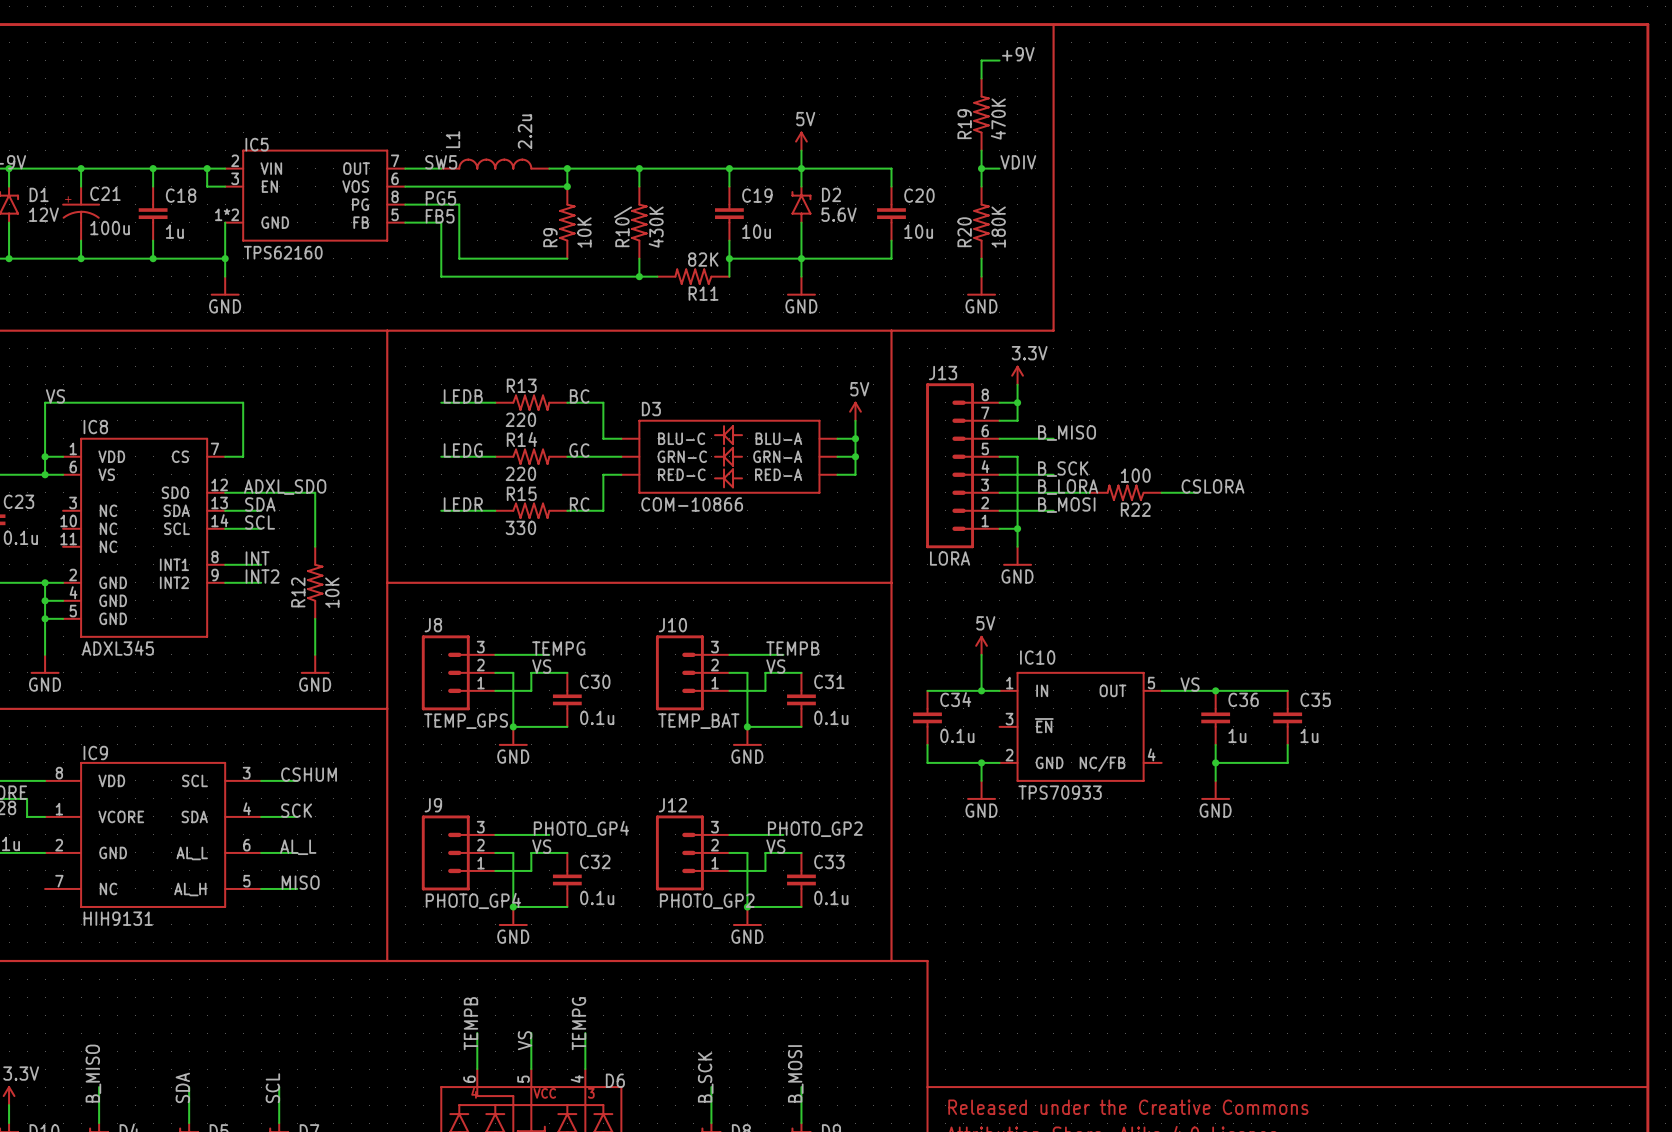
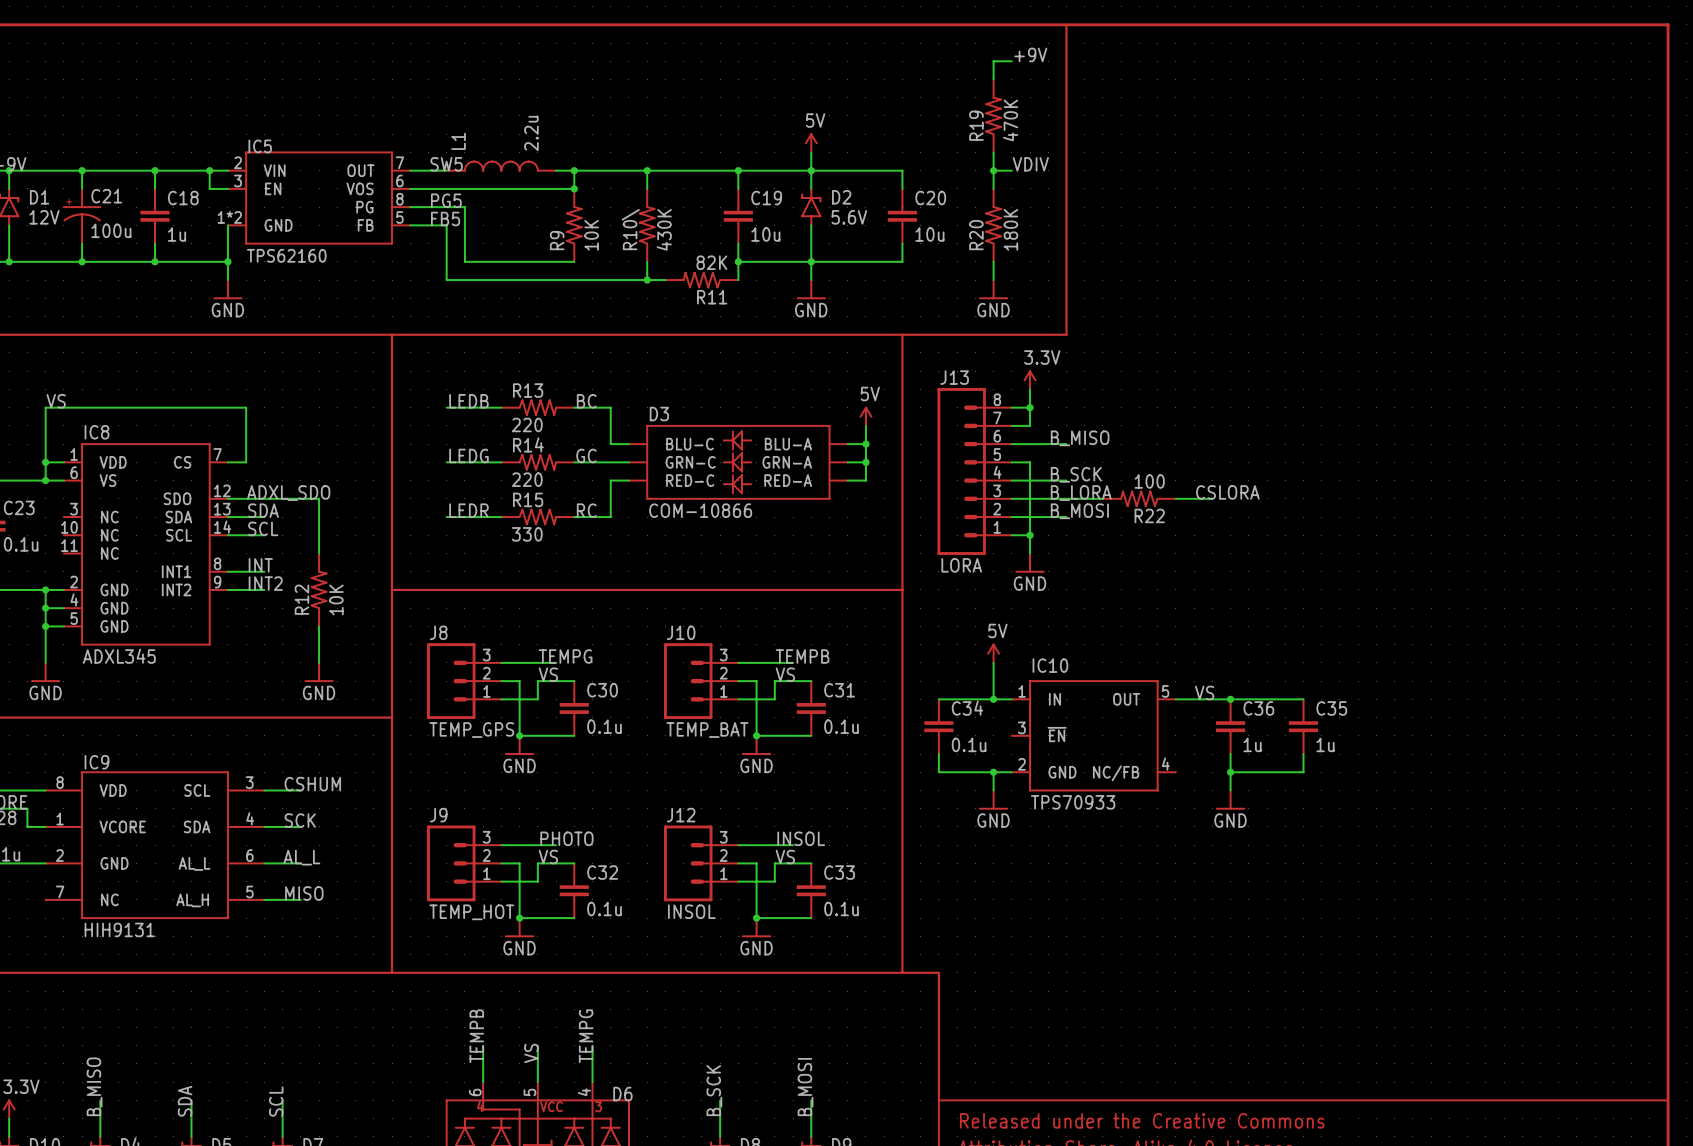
label: PHOTO_GP4 (581, 828) -> PHOTO (566, 838)
label: PHOTO_GP2 (815, 829) -> INSOL (801, 838)
J9 value: PHOTO_GP4 (473, 900) -> TEMP_HOT (471, 912)
J12 value: PHOTO_GP2 (707, 901) -> INSOL (691, 911)

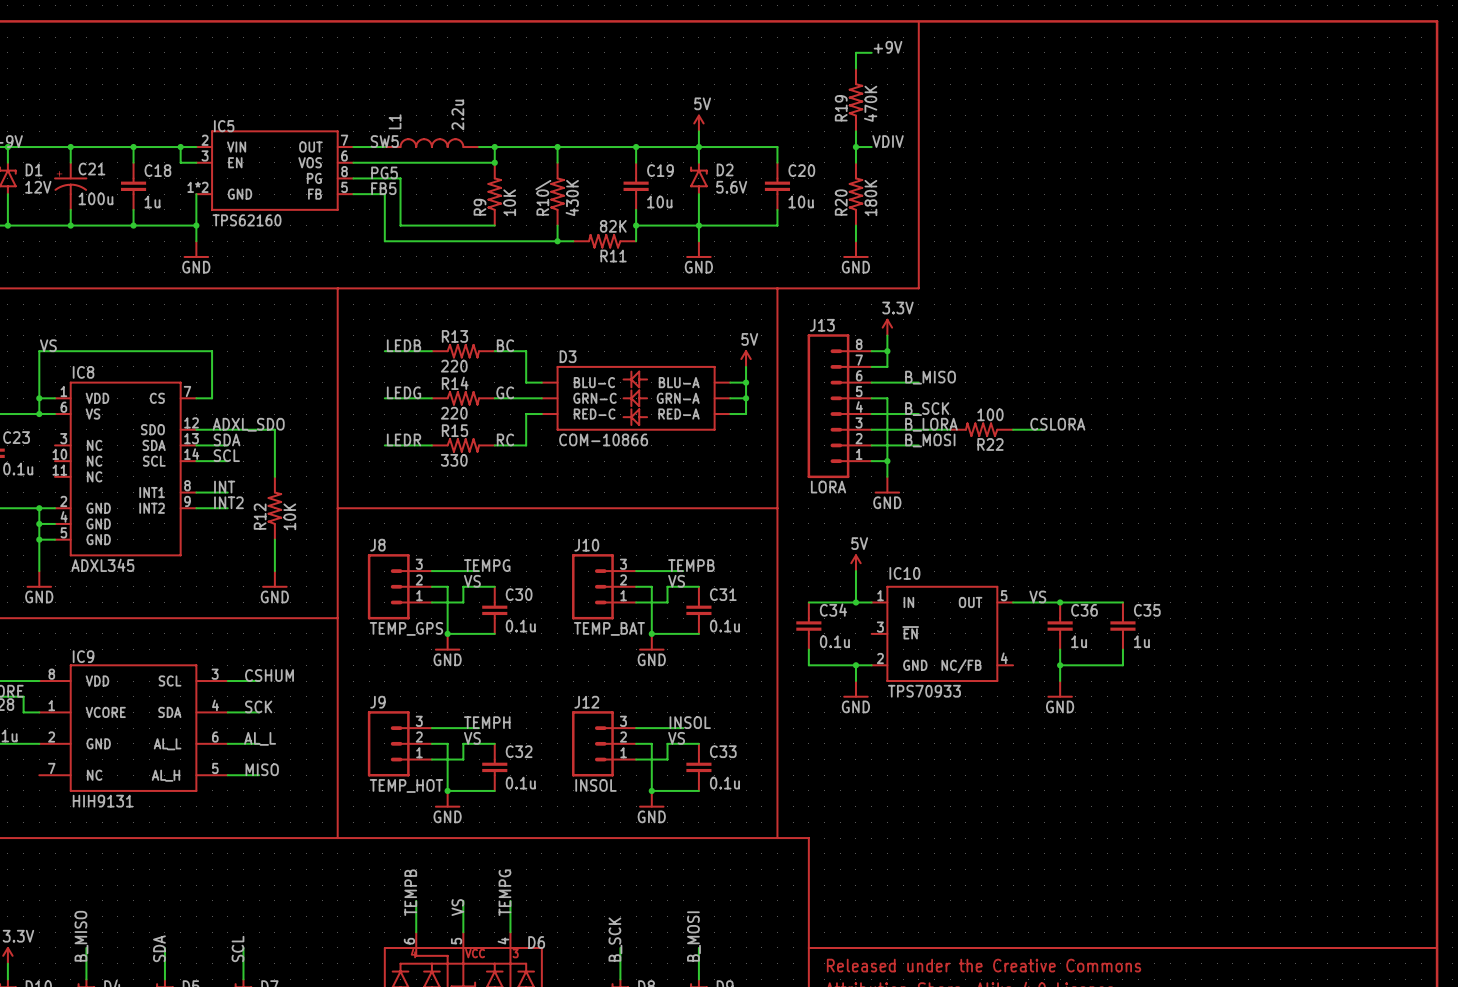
label: PHOTO (566, 838) -> TEMPH (487, 722)

